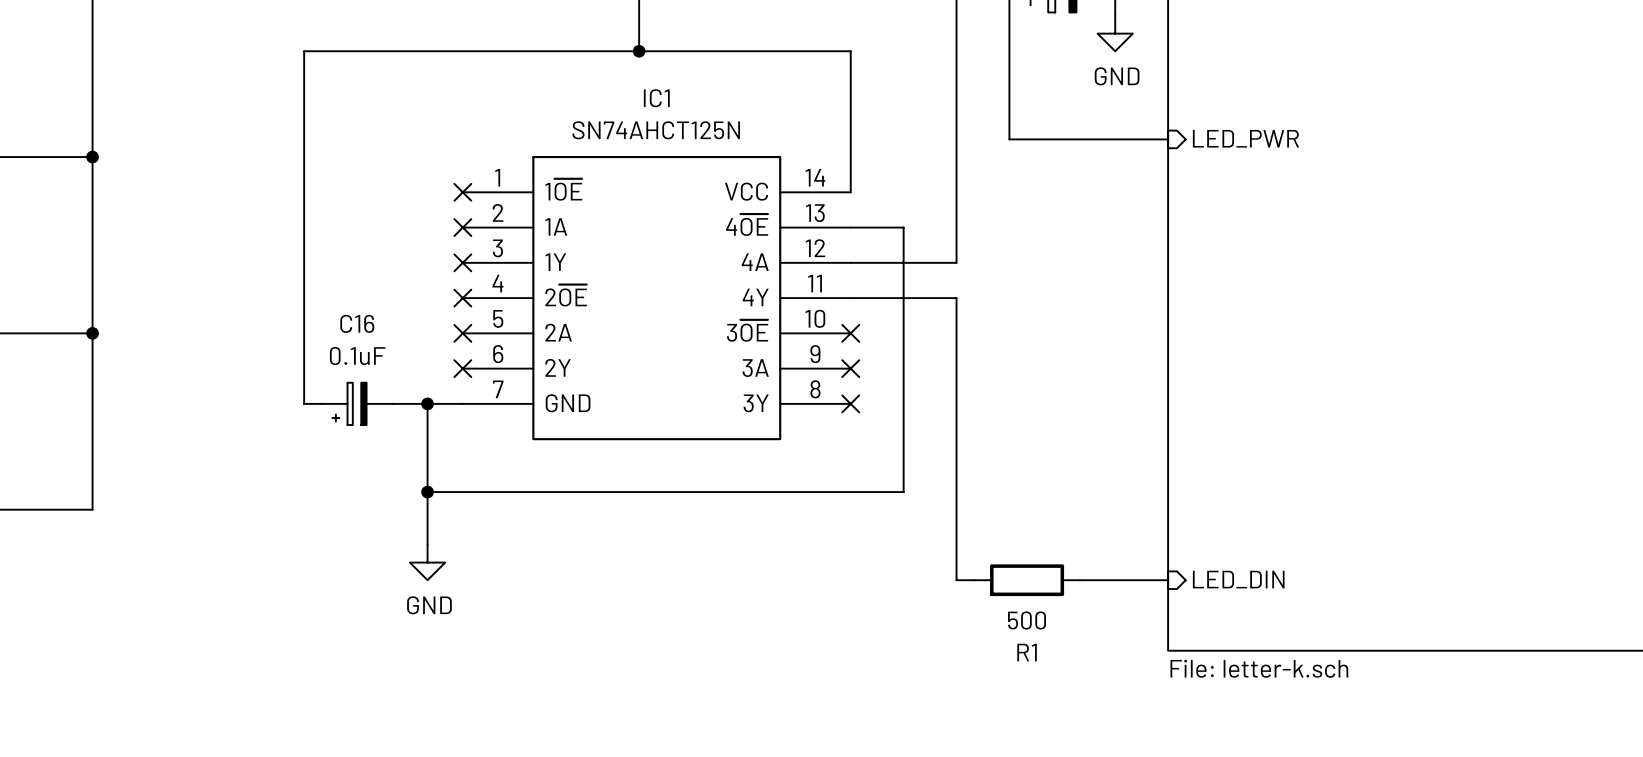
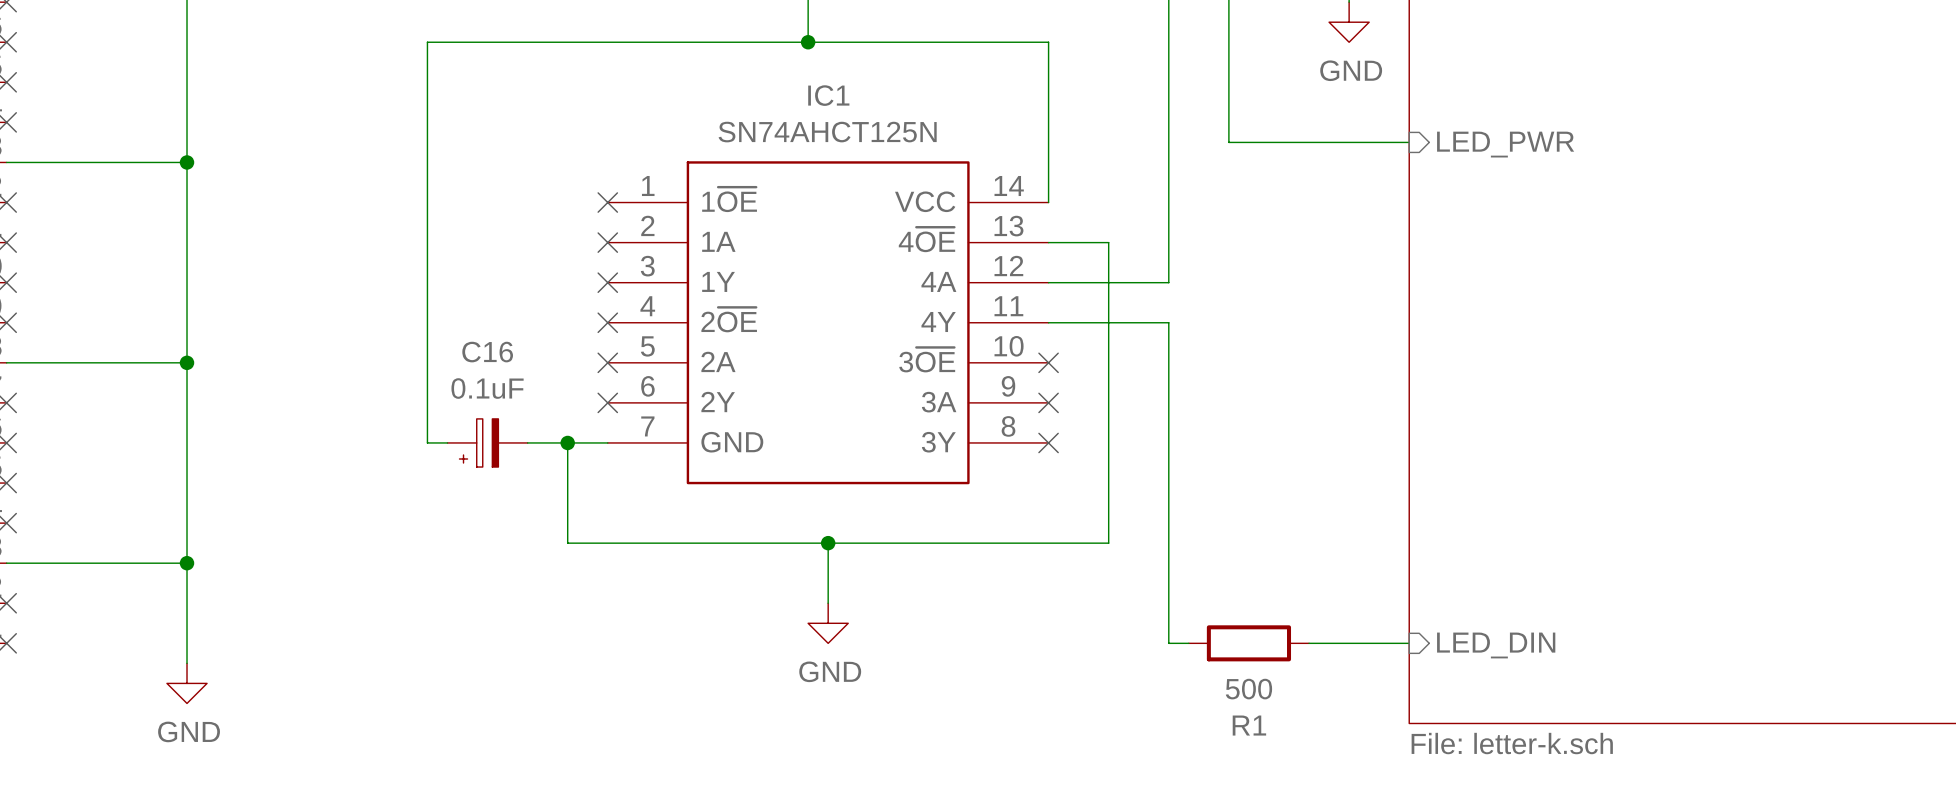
wire: (427, 492) (427, 544) -> (828, 543) (828, 603)
junction: (427, 492) -> none
junction: none -> (828, 543)
wire: none -> (187, 563) (187, 663)
junction: none -> (187, 563)
power symbol: GND (427, 562) -> none
power symbol: none -> GND (828, 623)
power symbol: none -> GND (187, 683)

